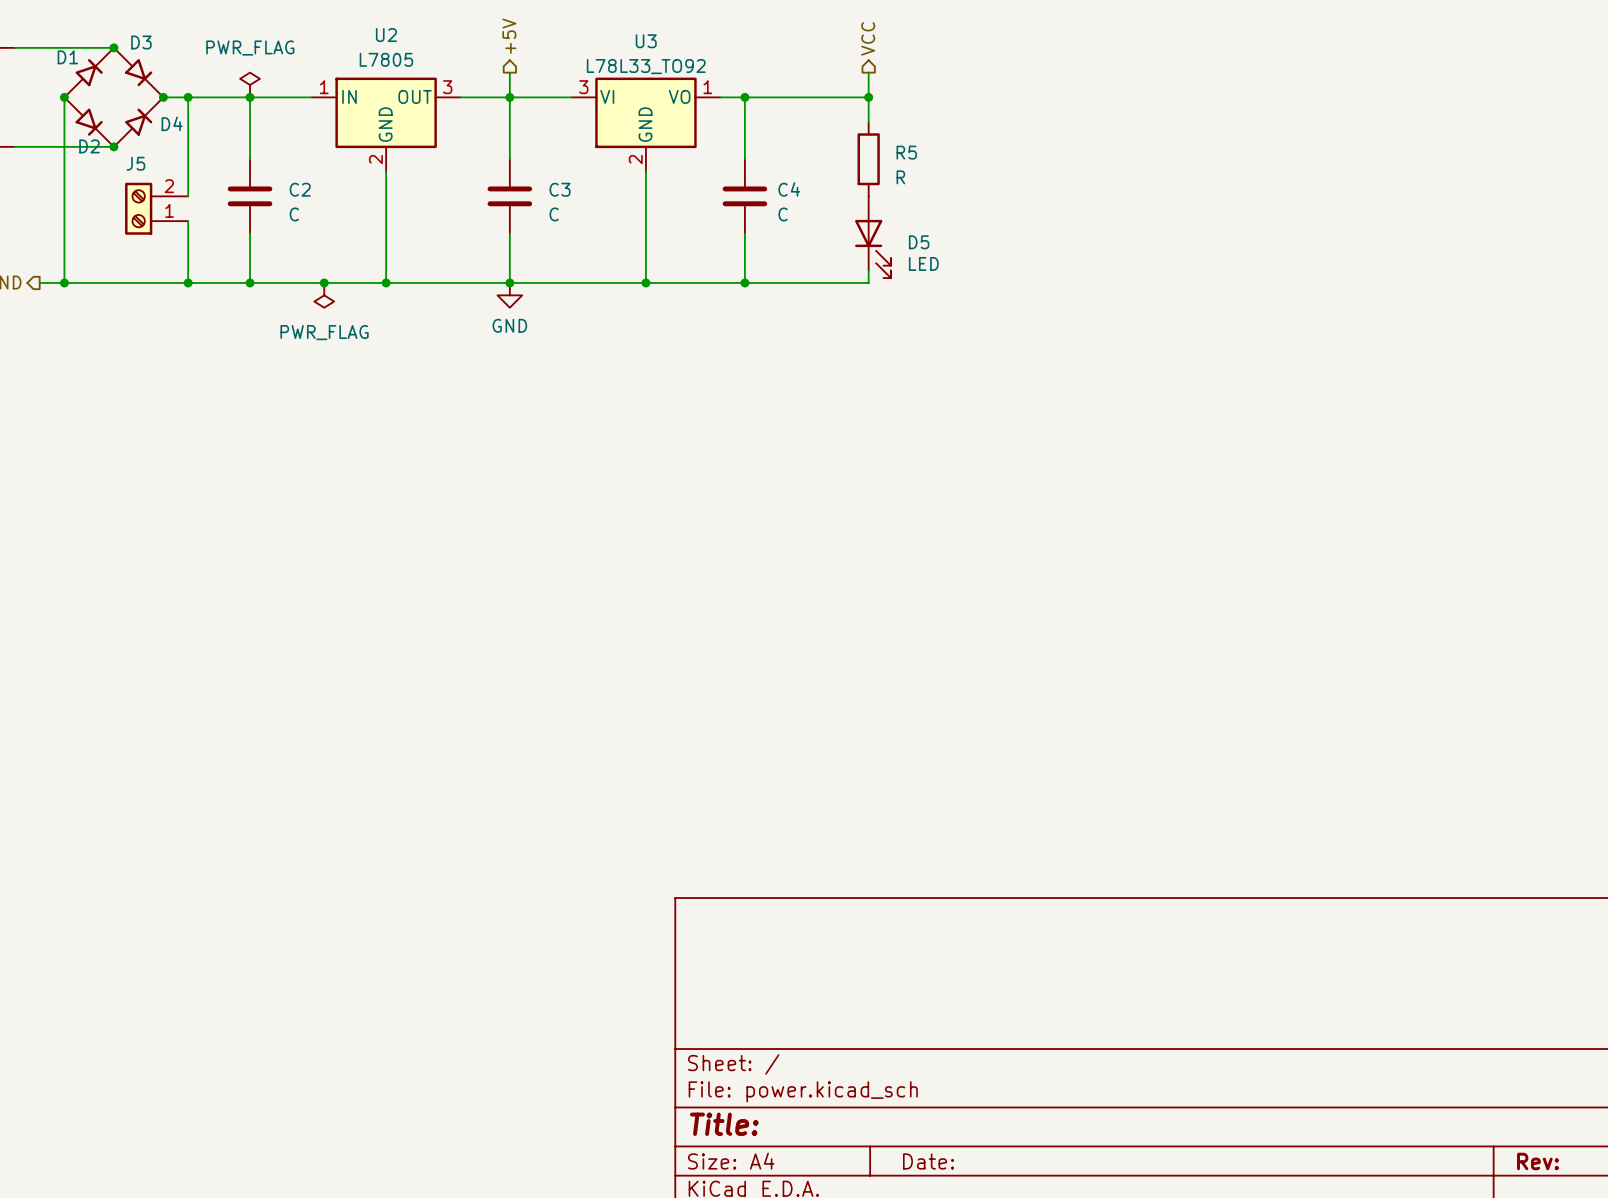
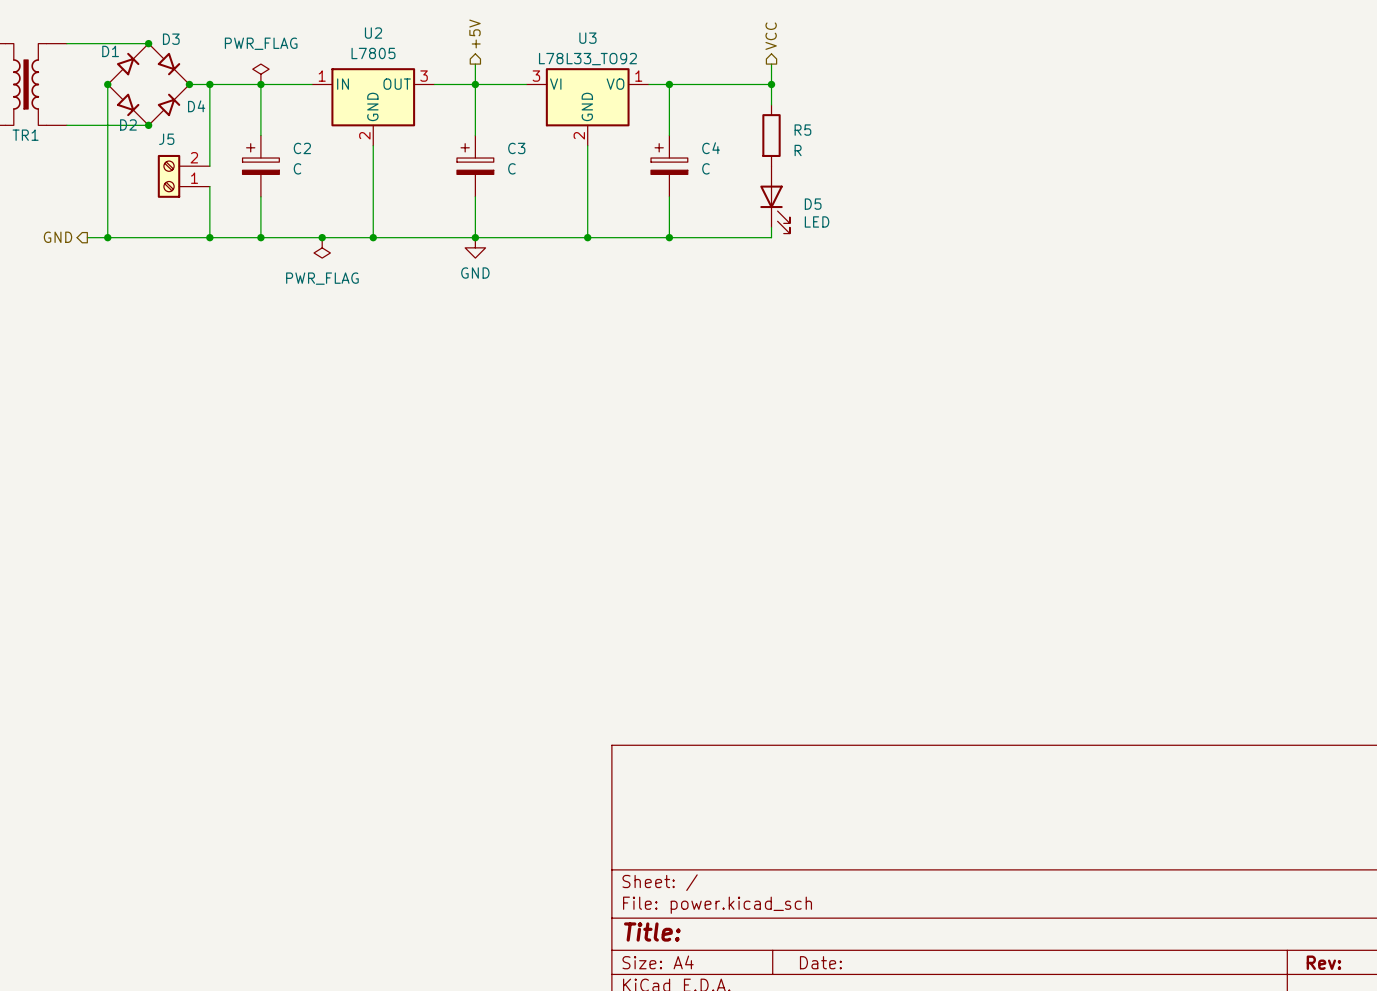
C2 symbol: [227, 159, 273, 234] -> [242, 135, 280, 197]
C3 symbol: [487, 159, 533, 234] -> [456, 135, 494, 197]
C4 symbol: [722, 159, 768, 234] -> [651, 135, 688, 197]

